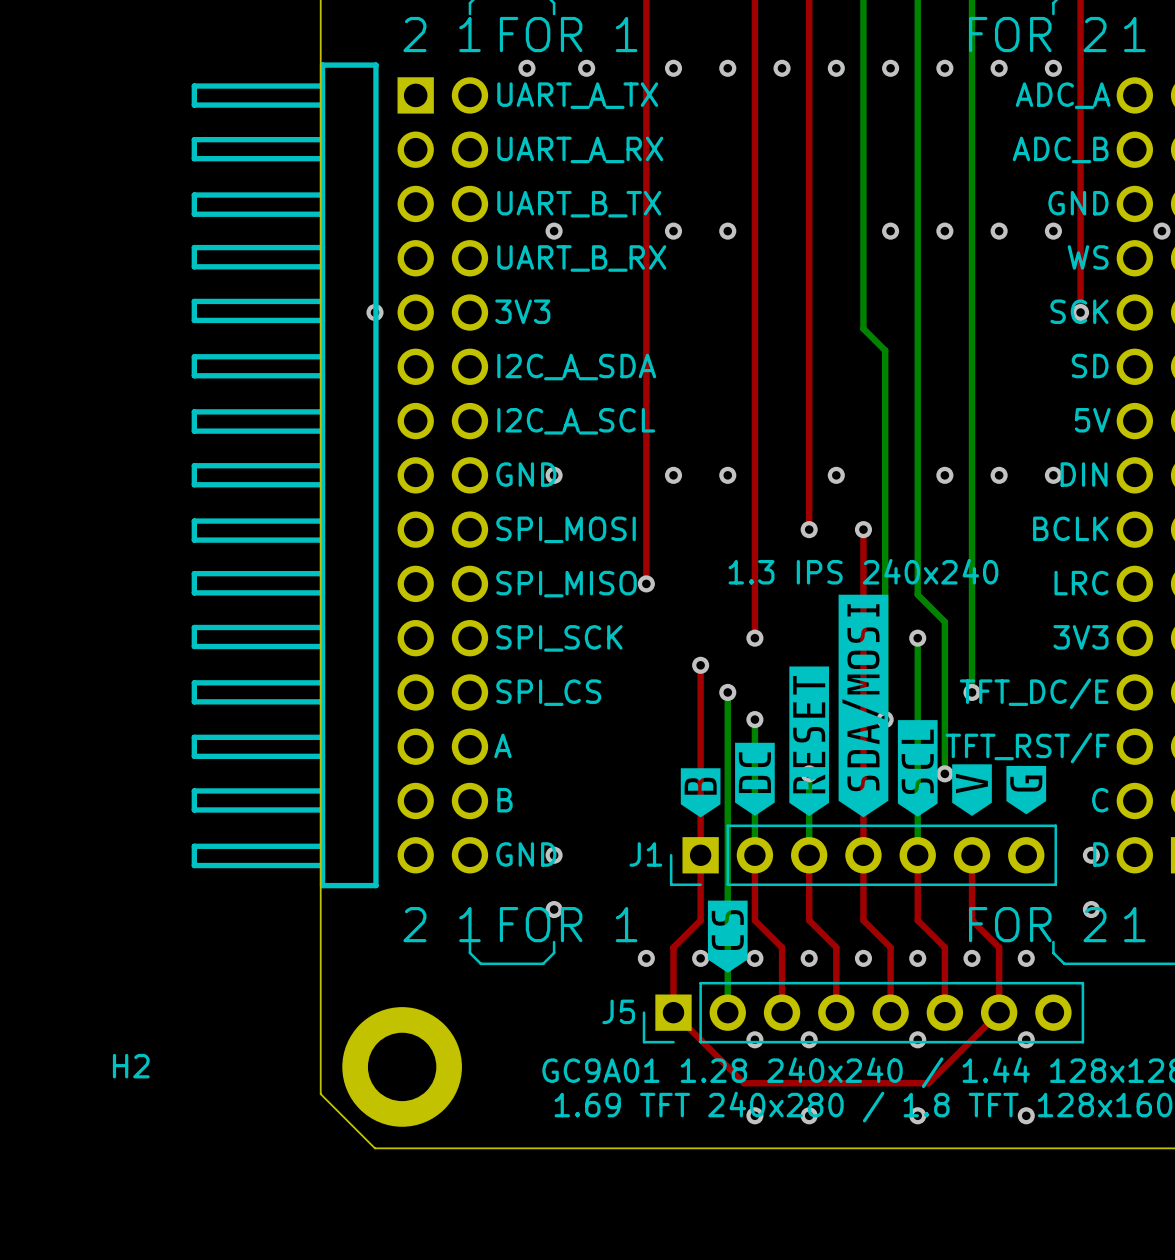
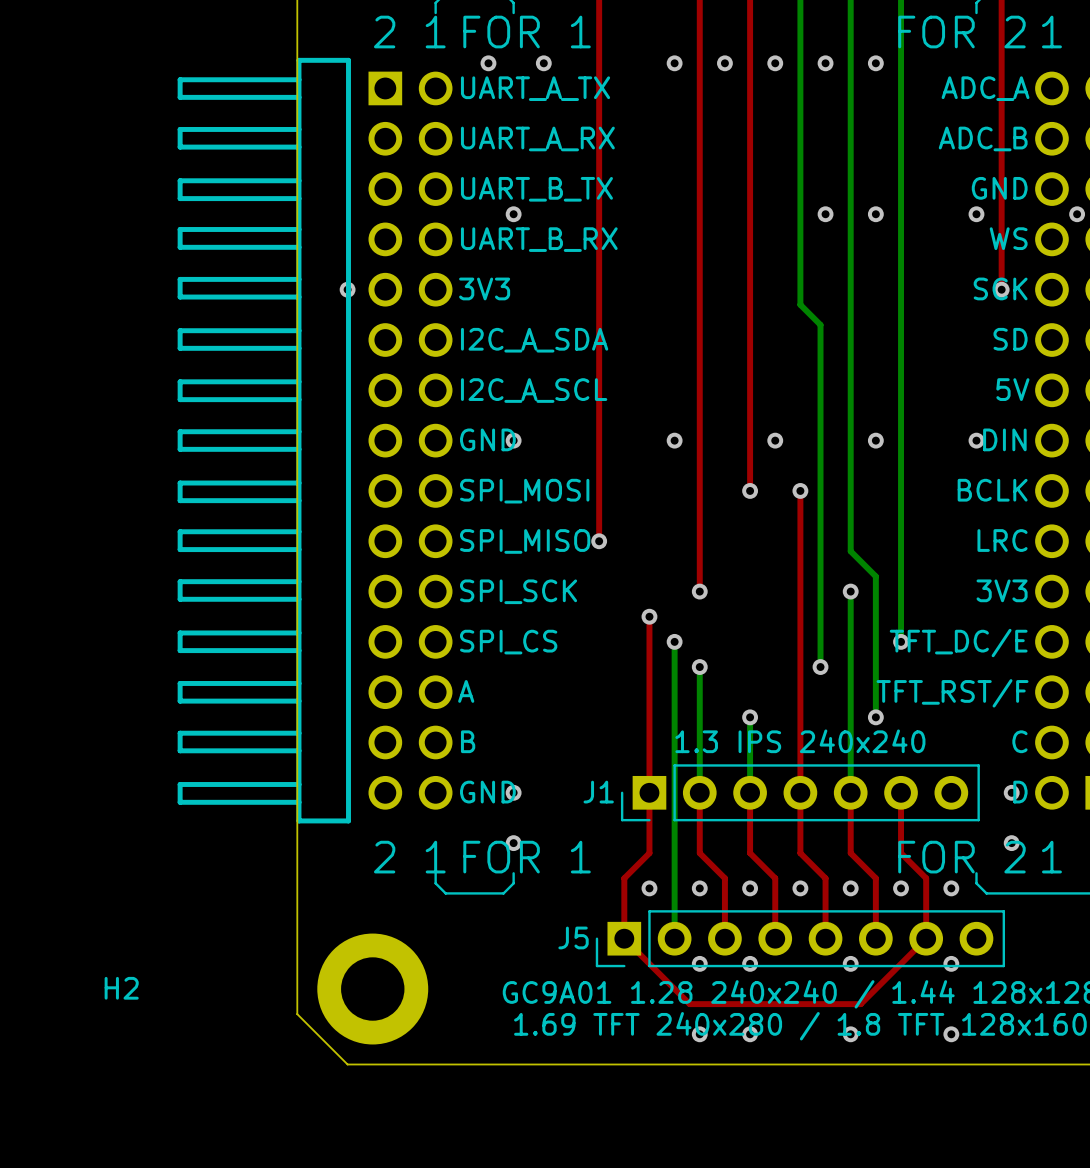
via: (673, 68) -> none
via: (999, 68) -> none
via: (1053, 68) -> none
via: (673, 231) -> none
via: (727, 231) -> none
via: (999, 231) -> none
via: (673, 475) -> none
via: (999, 475) -> none
text position: 1.3 IPS 240x240 (863, 571) -> 1.3 IPS 240x240 (800, 741)
drawing: [680, 594, 1047, 818] -> none
drawing: [707, 900, 748, 973] -> none
via: (646, 958) -> none

